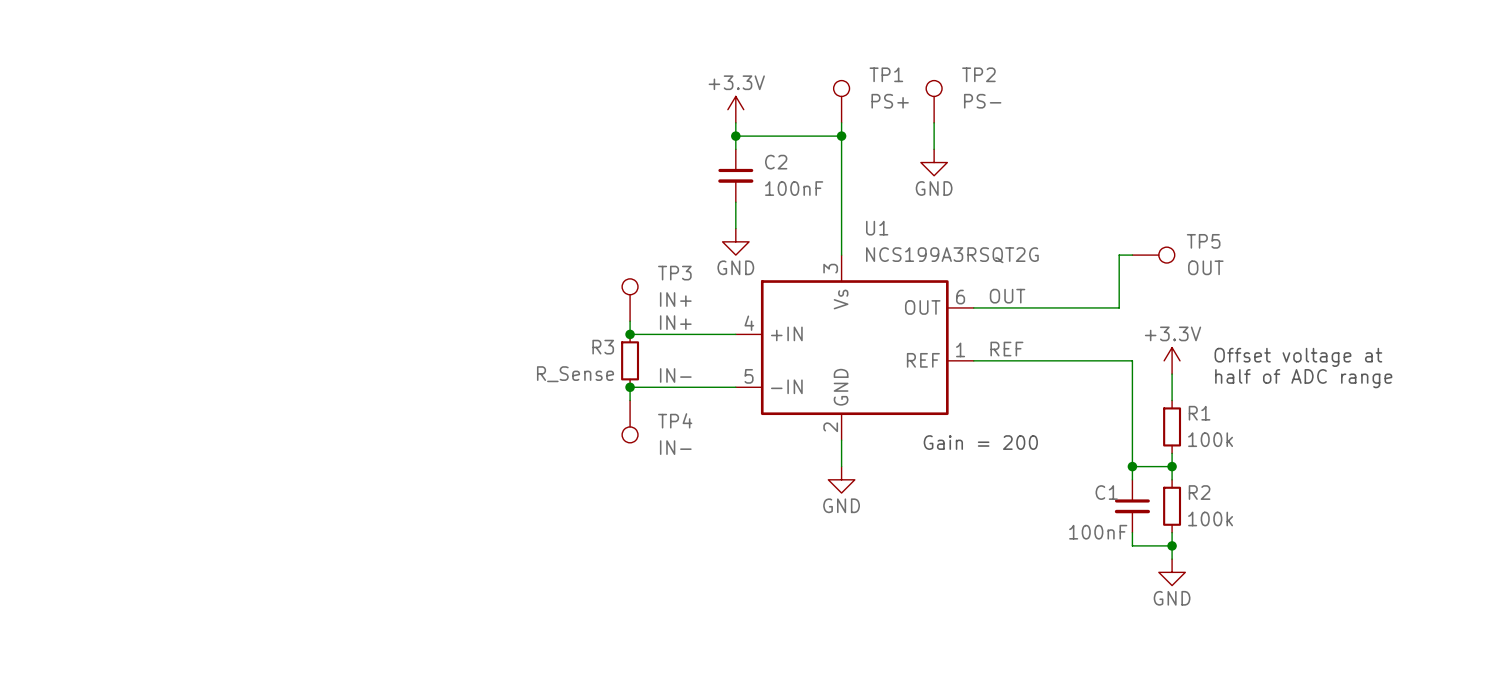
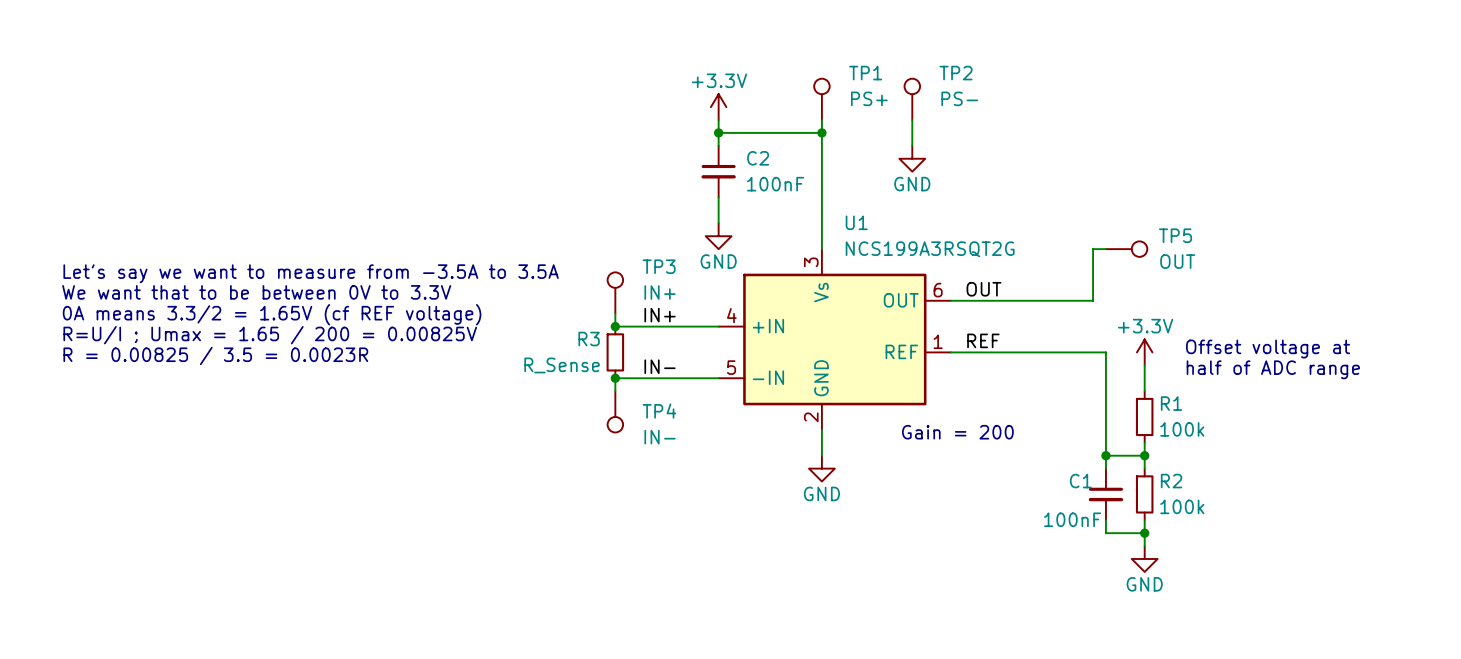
text: none -> Let's say we want to measure from -3.5A to 3.5A (311, 273)
text: none -> We want that to be between 0V to 3.3V (256, 292)
text: none -> 0A means 3.3/2 = 1.65V (cf REF voltage) (272, 314)
text: none -> R=U/I ; Umax = 1.65 / 200 = 0.00825V (270, 335)
text: none -> R = 0.00825 / 3.5 = 0.0023R (215, 355)

